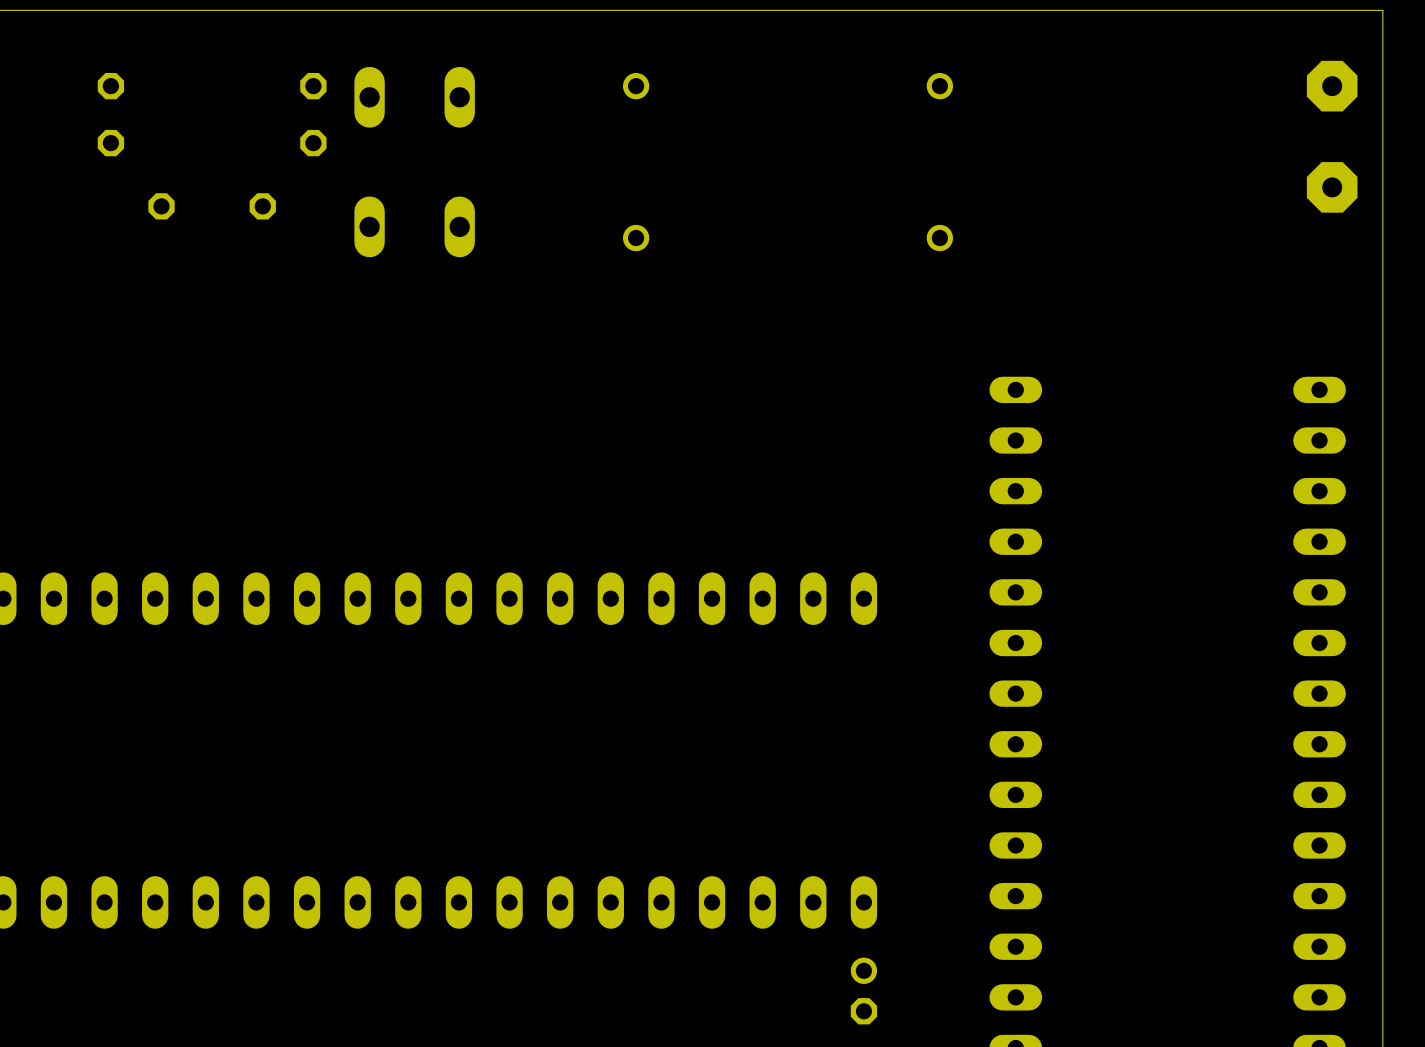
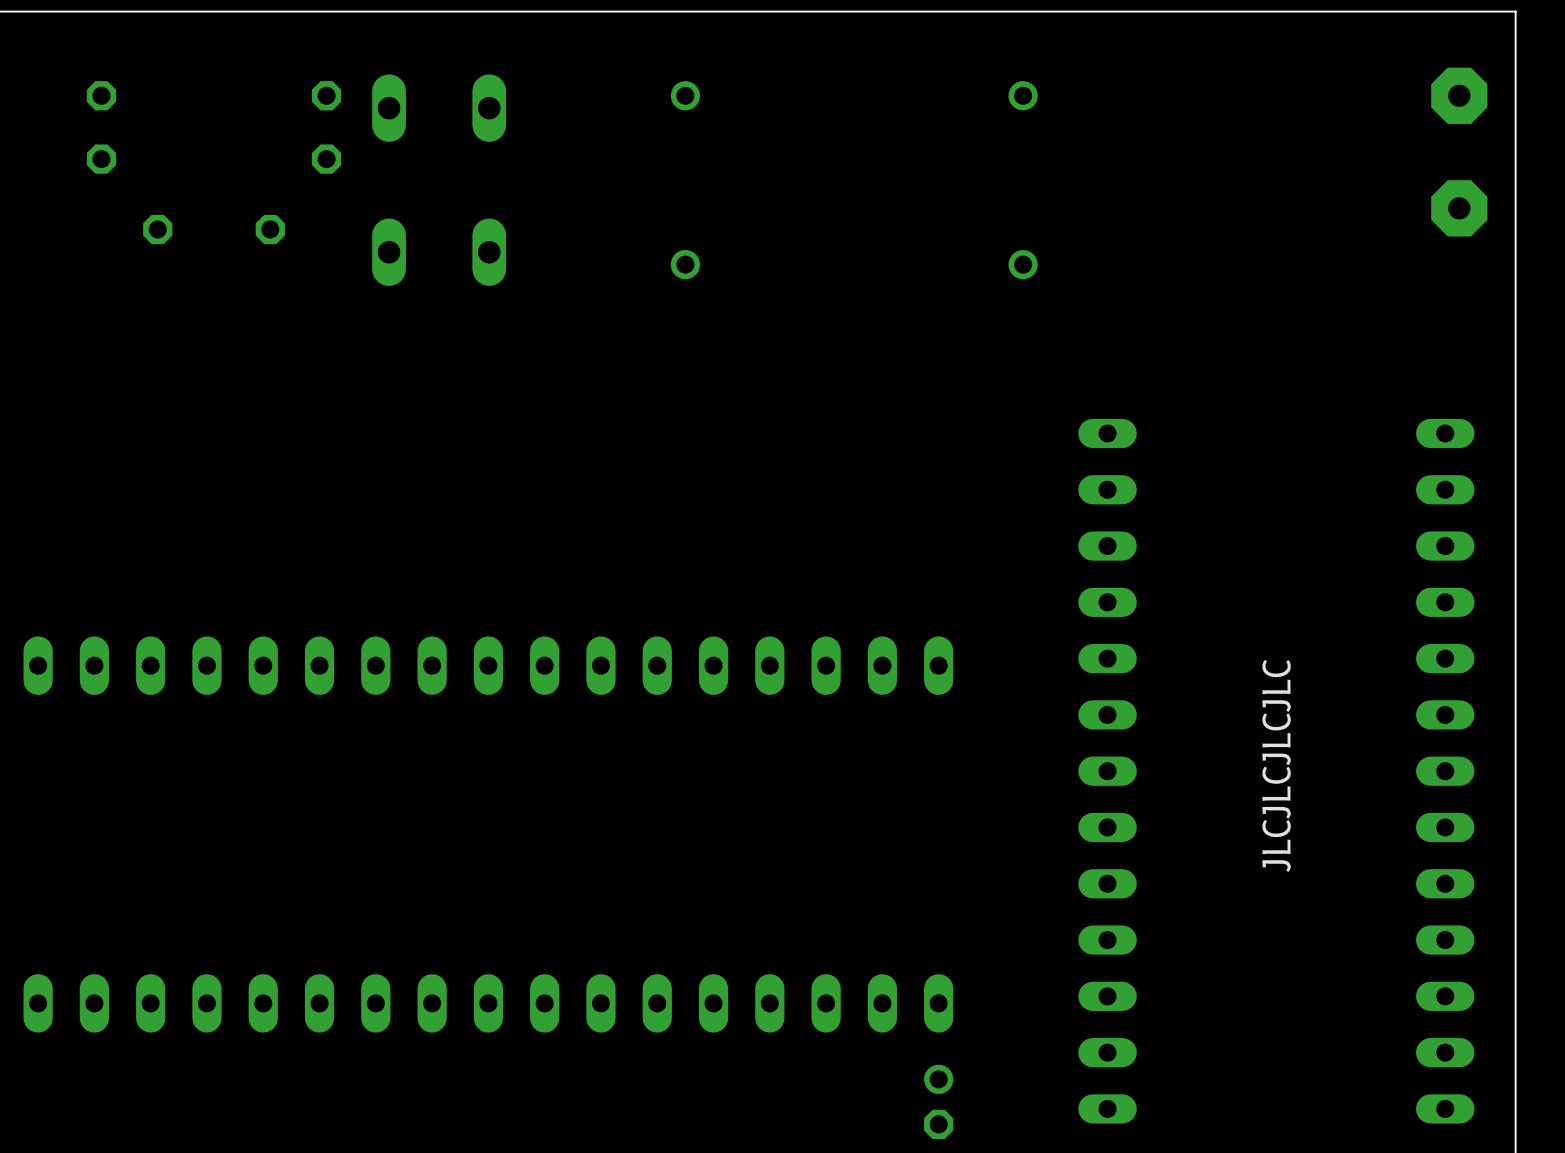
text: none -> JLCJLCJLCJLC (1276, 765)

